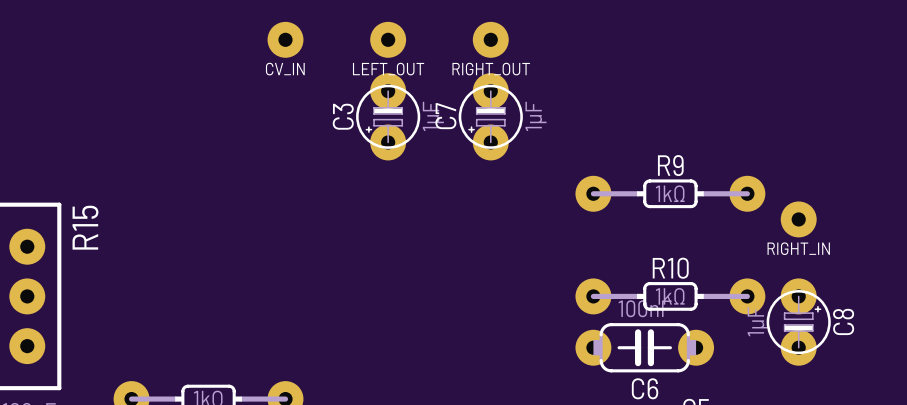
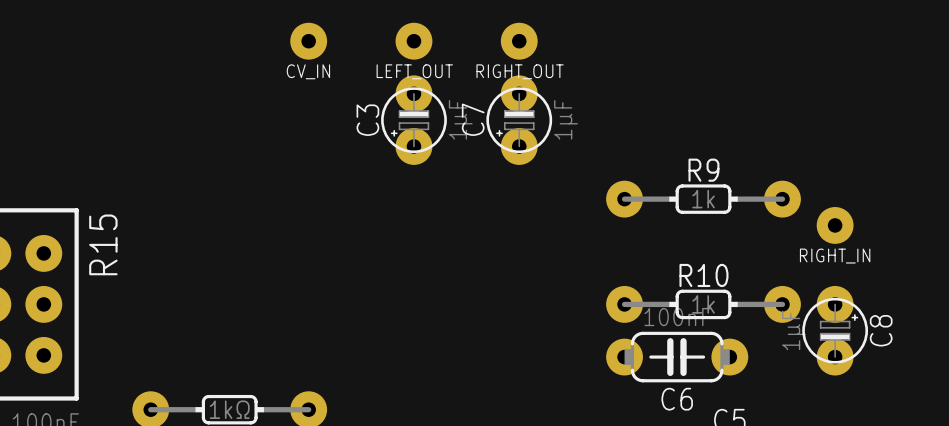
R9 value: 1kΩ (670, 193) -> 1k (703, 199)
R10 value: 1kΩ (670, 296) -> 1k (703, 304)

